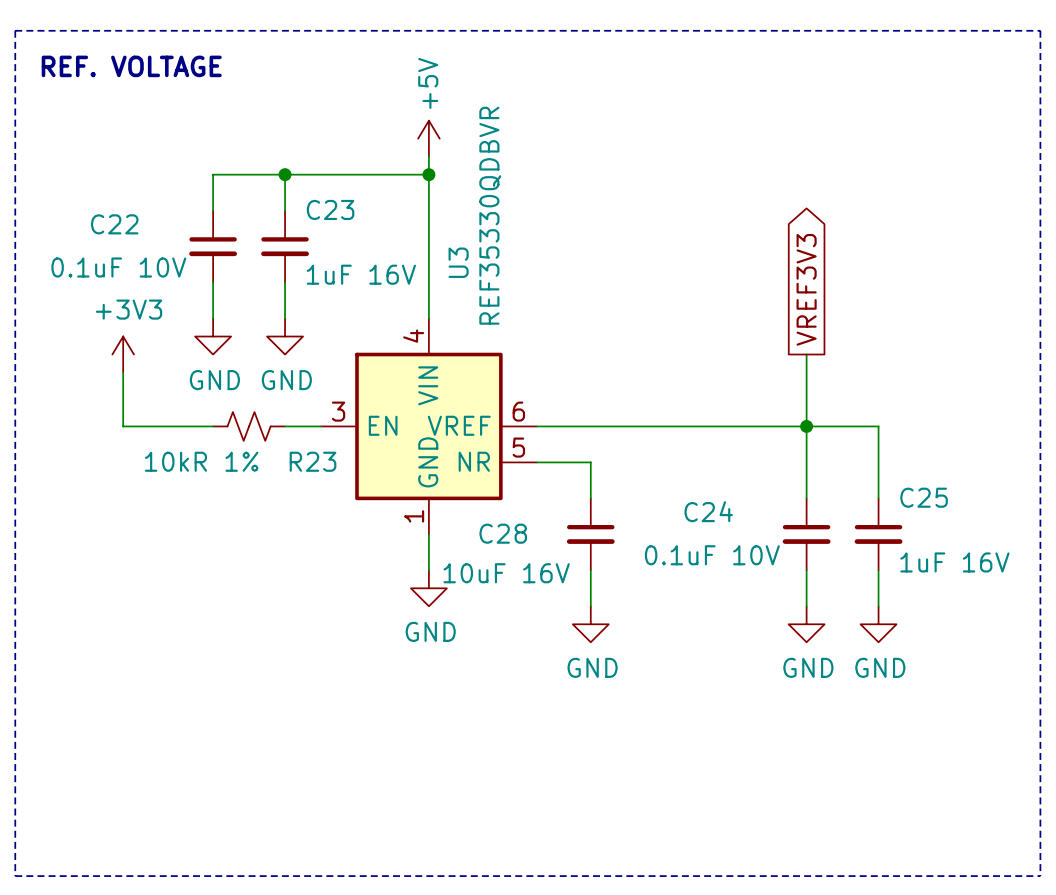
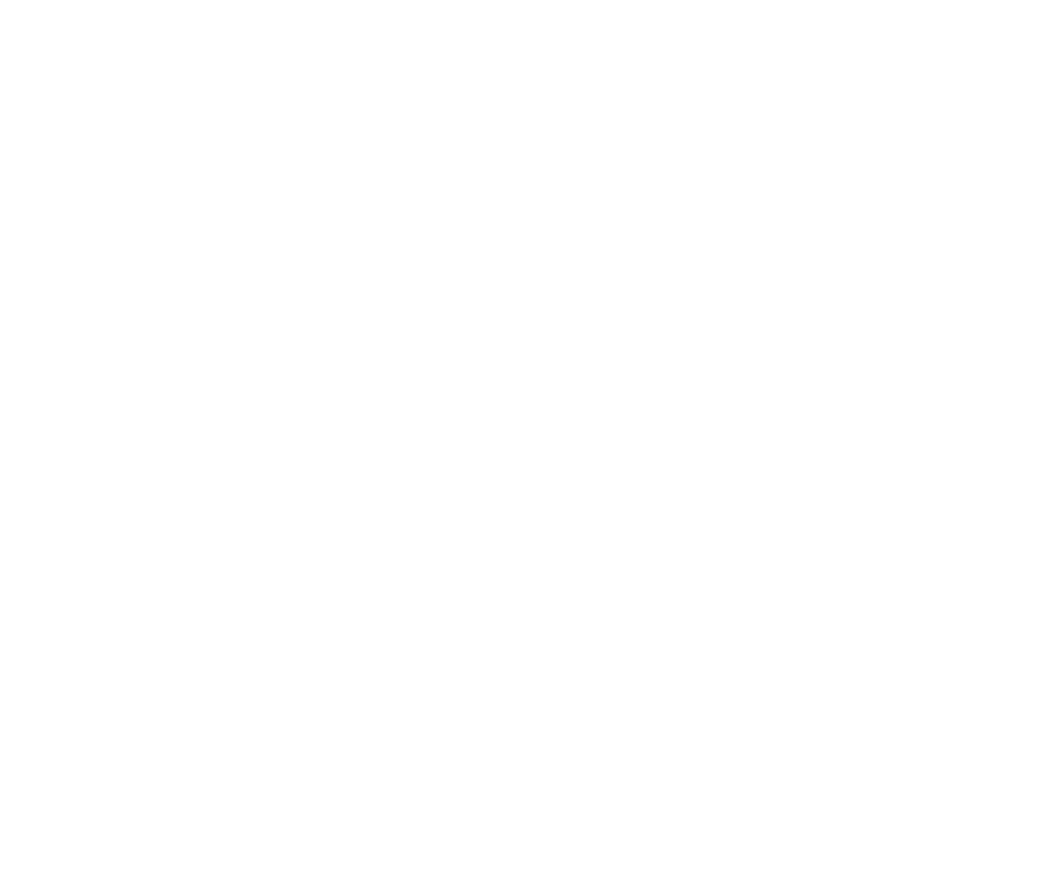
line: (15, 30) (15, 876) (1040, 876) (1040, 30) (15, 30) -> none
text: REF. VOLTAGE (131, 66) -> none
power symbol: +5V (428, 138) -> none
wire: (428, 156) (428, 318) -> none
wire: (285, 174) (285, 210) -> none
junction: (285, 174) -> none
wire: (428, 174) (213, 174) (213, 210) -> none
junction: (428, 174) -> none
C22: 0.1uF 10V (213, 246) -> none
C23: 1uF 16V (285, 246) -> none
wire: (213, 282) (213, 318) -> none
wire: (285, 282) (285, 318) -> none
global label: VREF3V3 (806, 289) -> none
power symbol: GND (213, 336) -> none
power symbol: GND (285, 336) -> none
power symbol: +3V3 (123, 354) -> none
wire: (806, 354) (806, 498) -> none
wire: (123, 372) (123, 426) (213, 426) -> none
R23: 10kR 1% (249, 426) -> none
wire: (285, 426) (321, 426) -> none
U3: REF35330QDBVR (428, 426) -> none
wire: (536, 426) (878, 426) (878, 498) -> none
junction: (806, 426) -> none
wire: (536, 462) (590, 462) (590, 498) -> none
wire: (428, 534) (428, 570) -> none
C28: 10uF 16V (590, 534) -> none
C24: 0.1uF 10V (806, 534) -> none
C25: 1uF 16V (878, 534) -> none
wire: (590, 570) (590, 606) -> none
wire: (806, 570) (806, 606) -> none
wire: (878, 570) (878, 606) -> none
power symbol: GND (428, 588) -> none
power symbol: GND (590, 624) -> none
power symbol: GND (806, 624) -> none
power symbol: GND (878, 624) -> none

